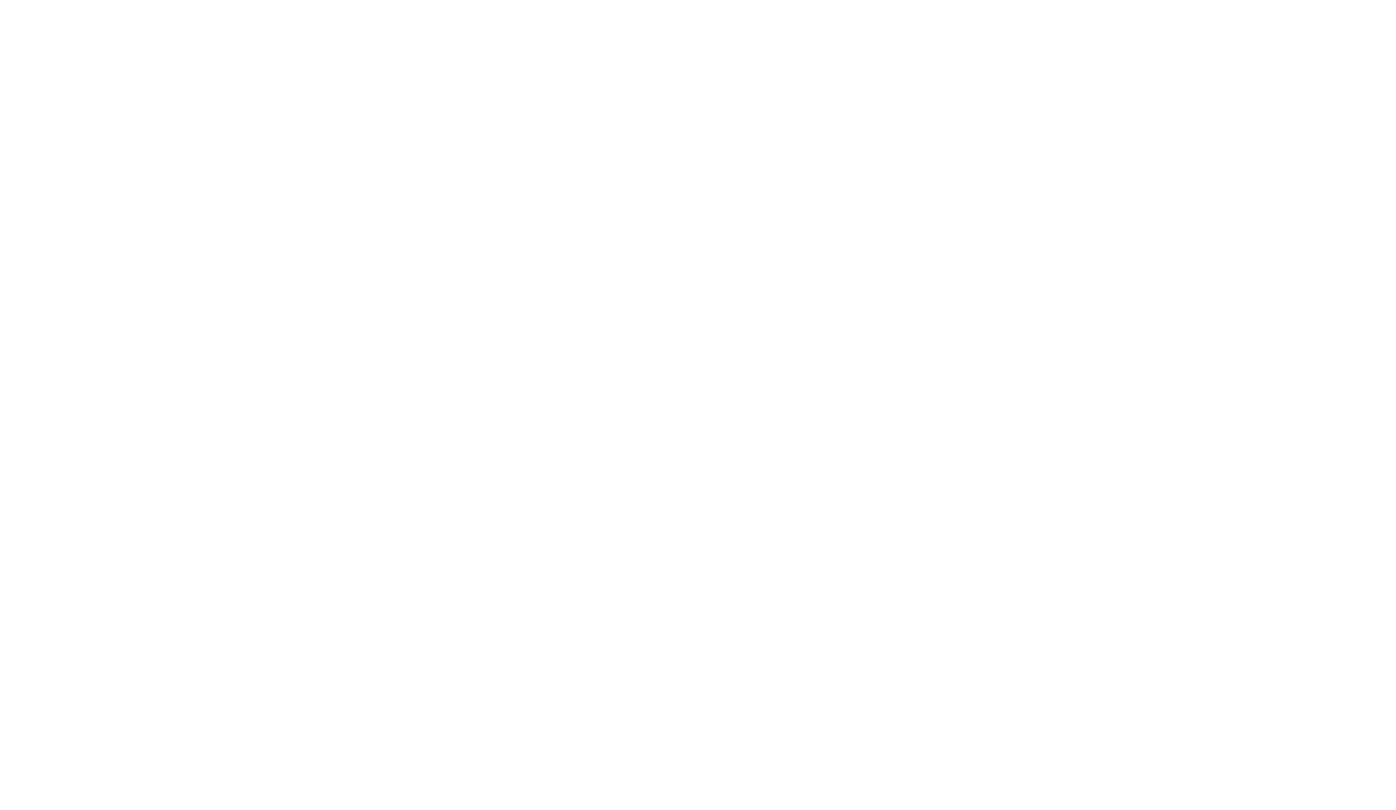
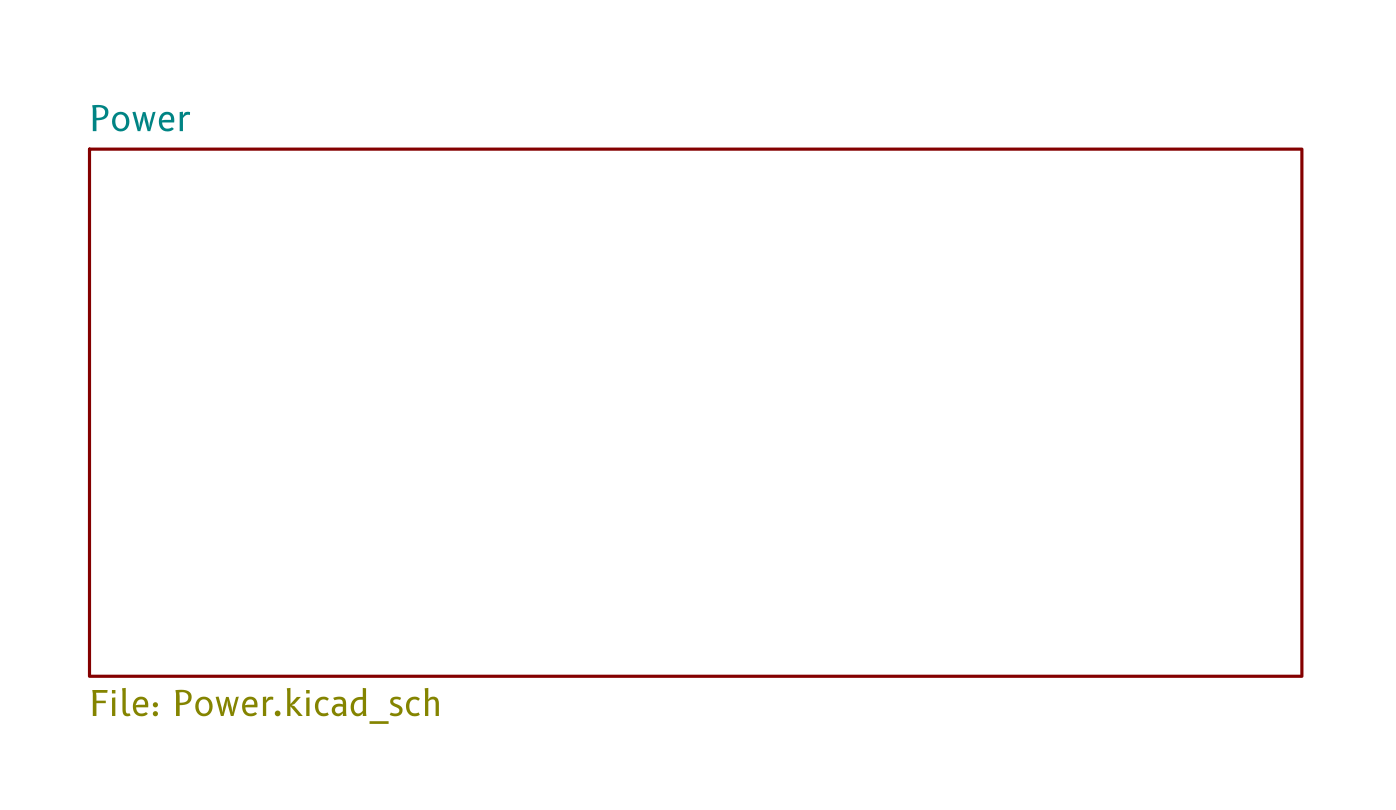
sheet Power: none -> File: Power.kicad_sch (695, 412)

